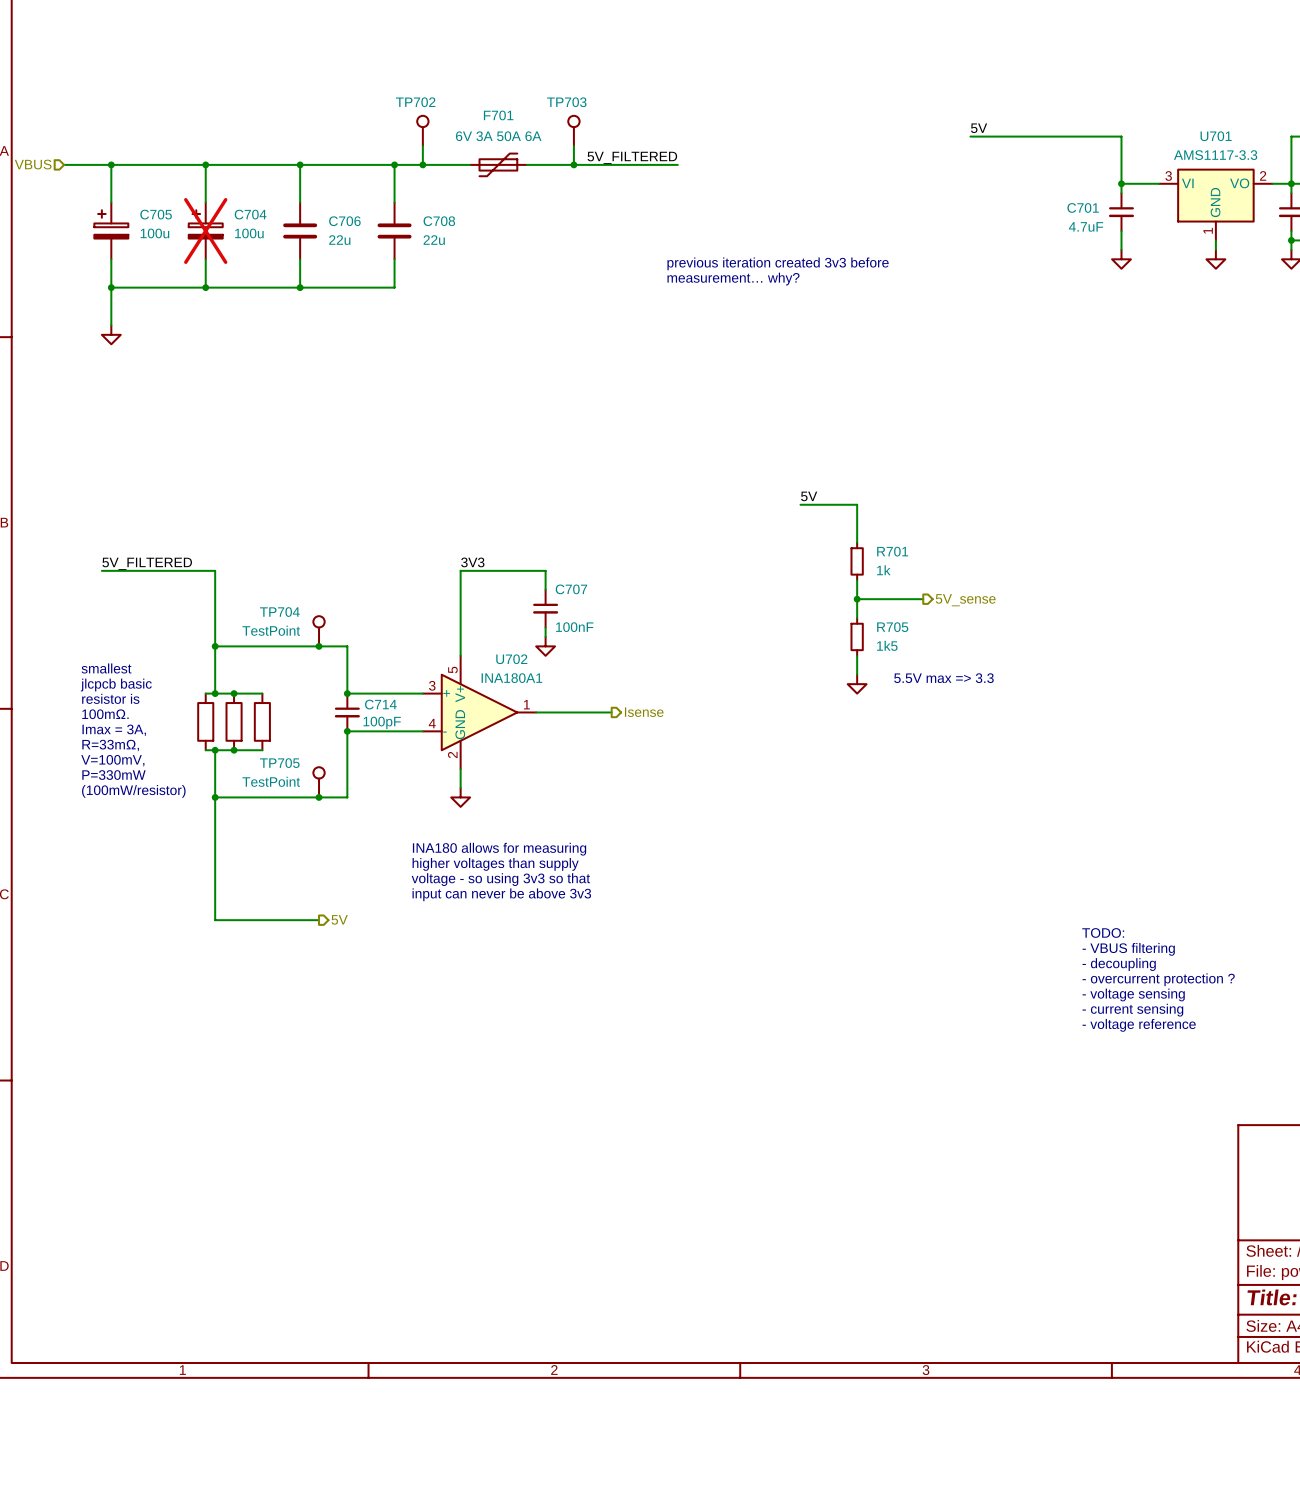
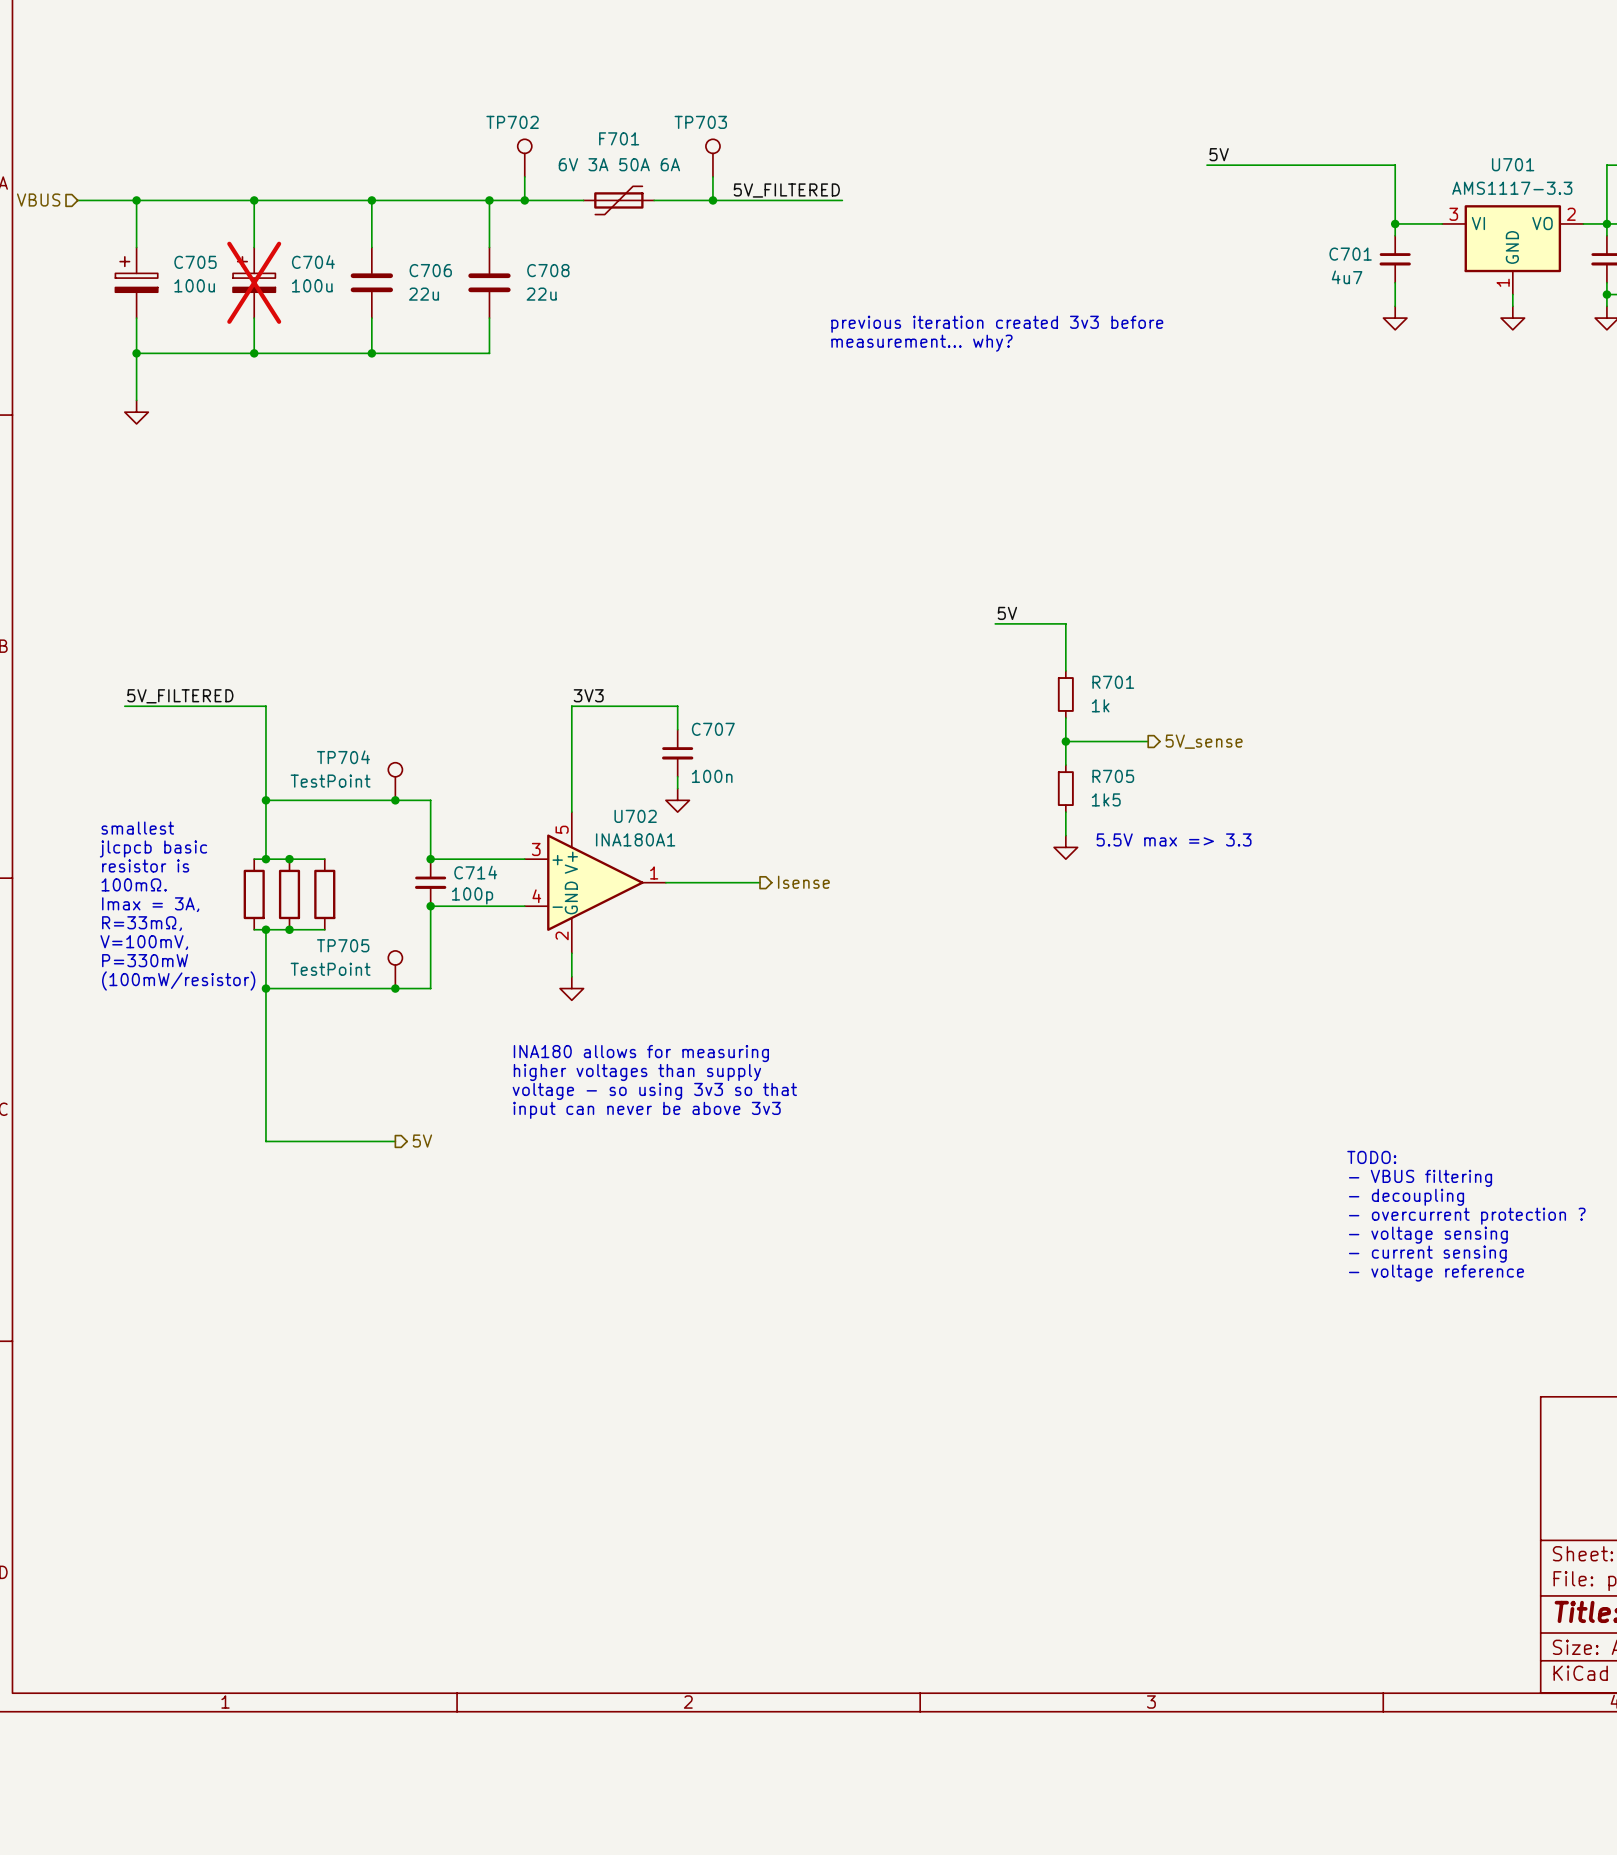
C701 value: 4.7uF (1086, 226) -> 4u7 (1347, 277)
C707 value: 100nF (574, 627) -> 100n (712, 776)
C714 value: 100pF (382, 722) -> 100p (472, 895)

